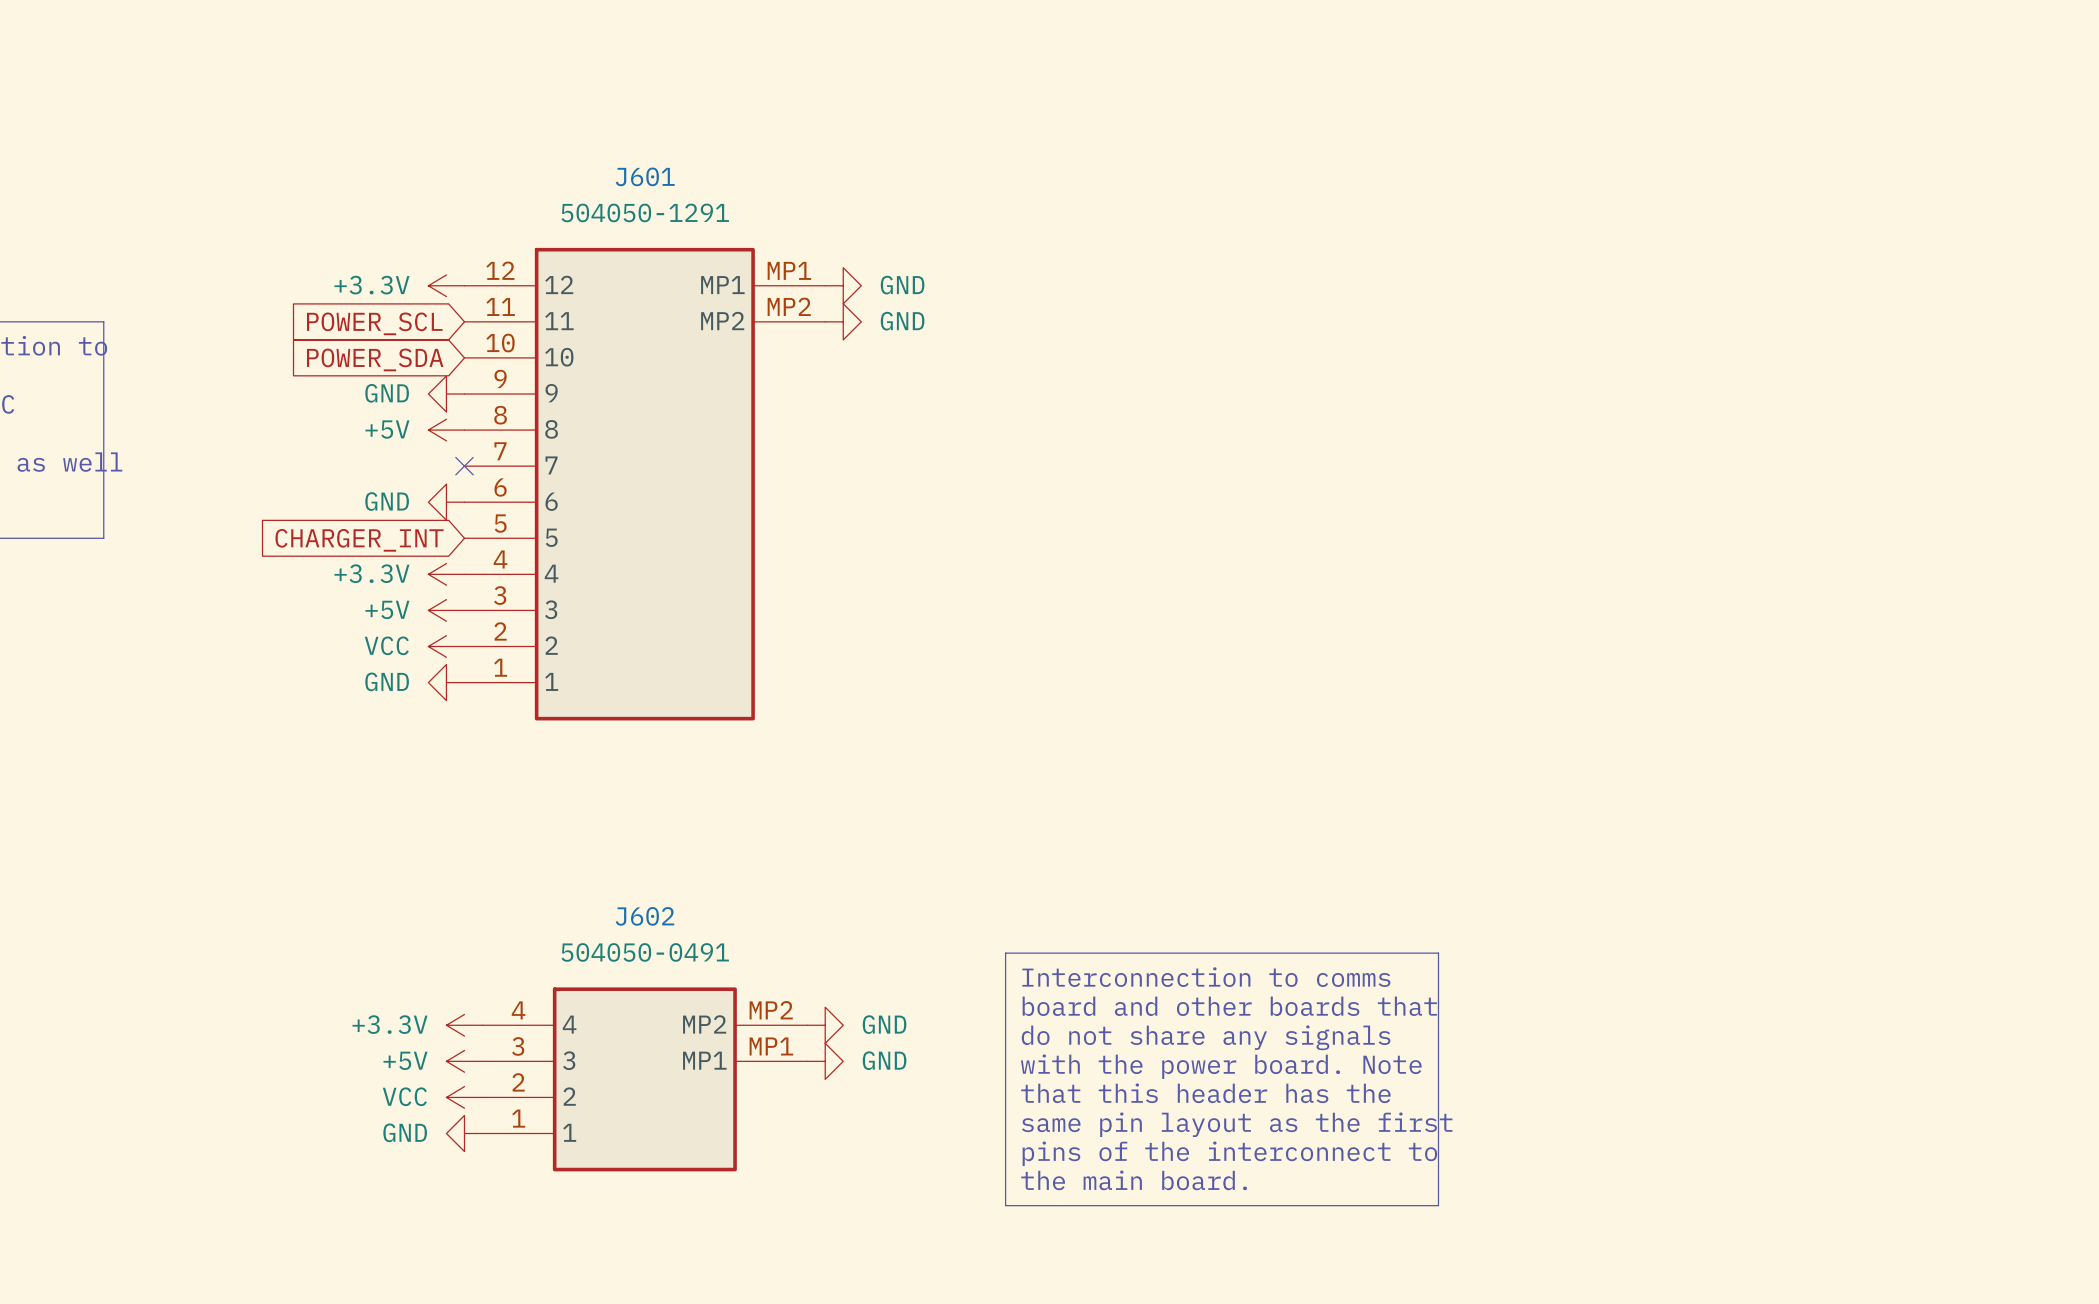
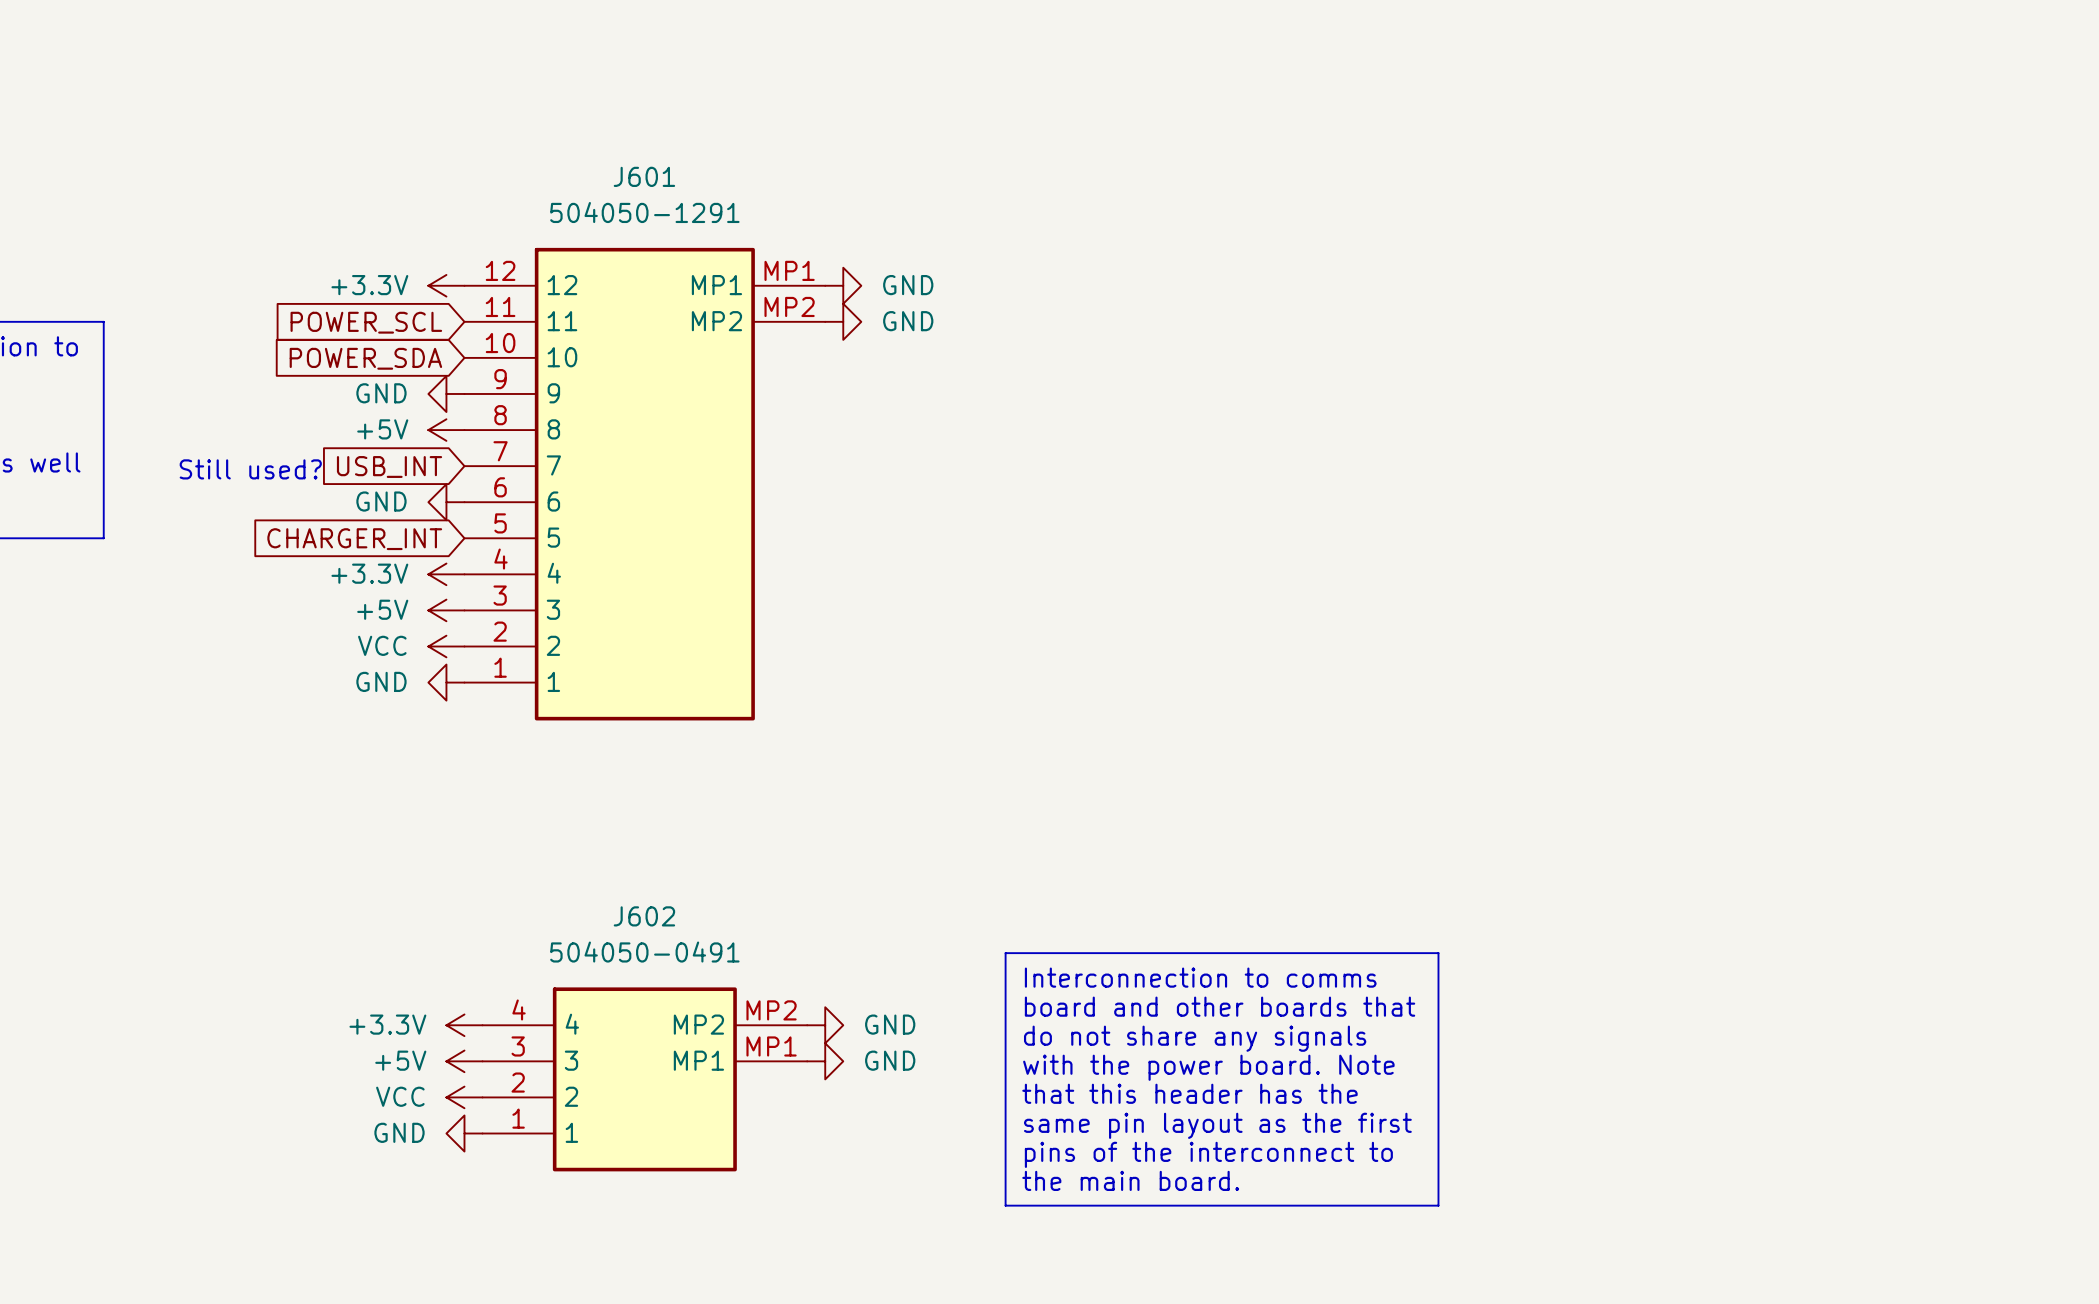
no-connect mark: (464, 466) -> none
text: none -> Still used? (250, 469)
global label: none -> USB_INT (389, 466)

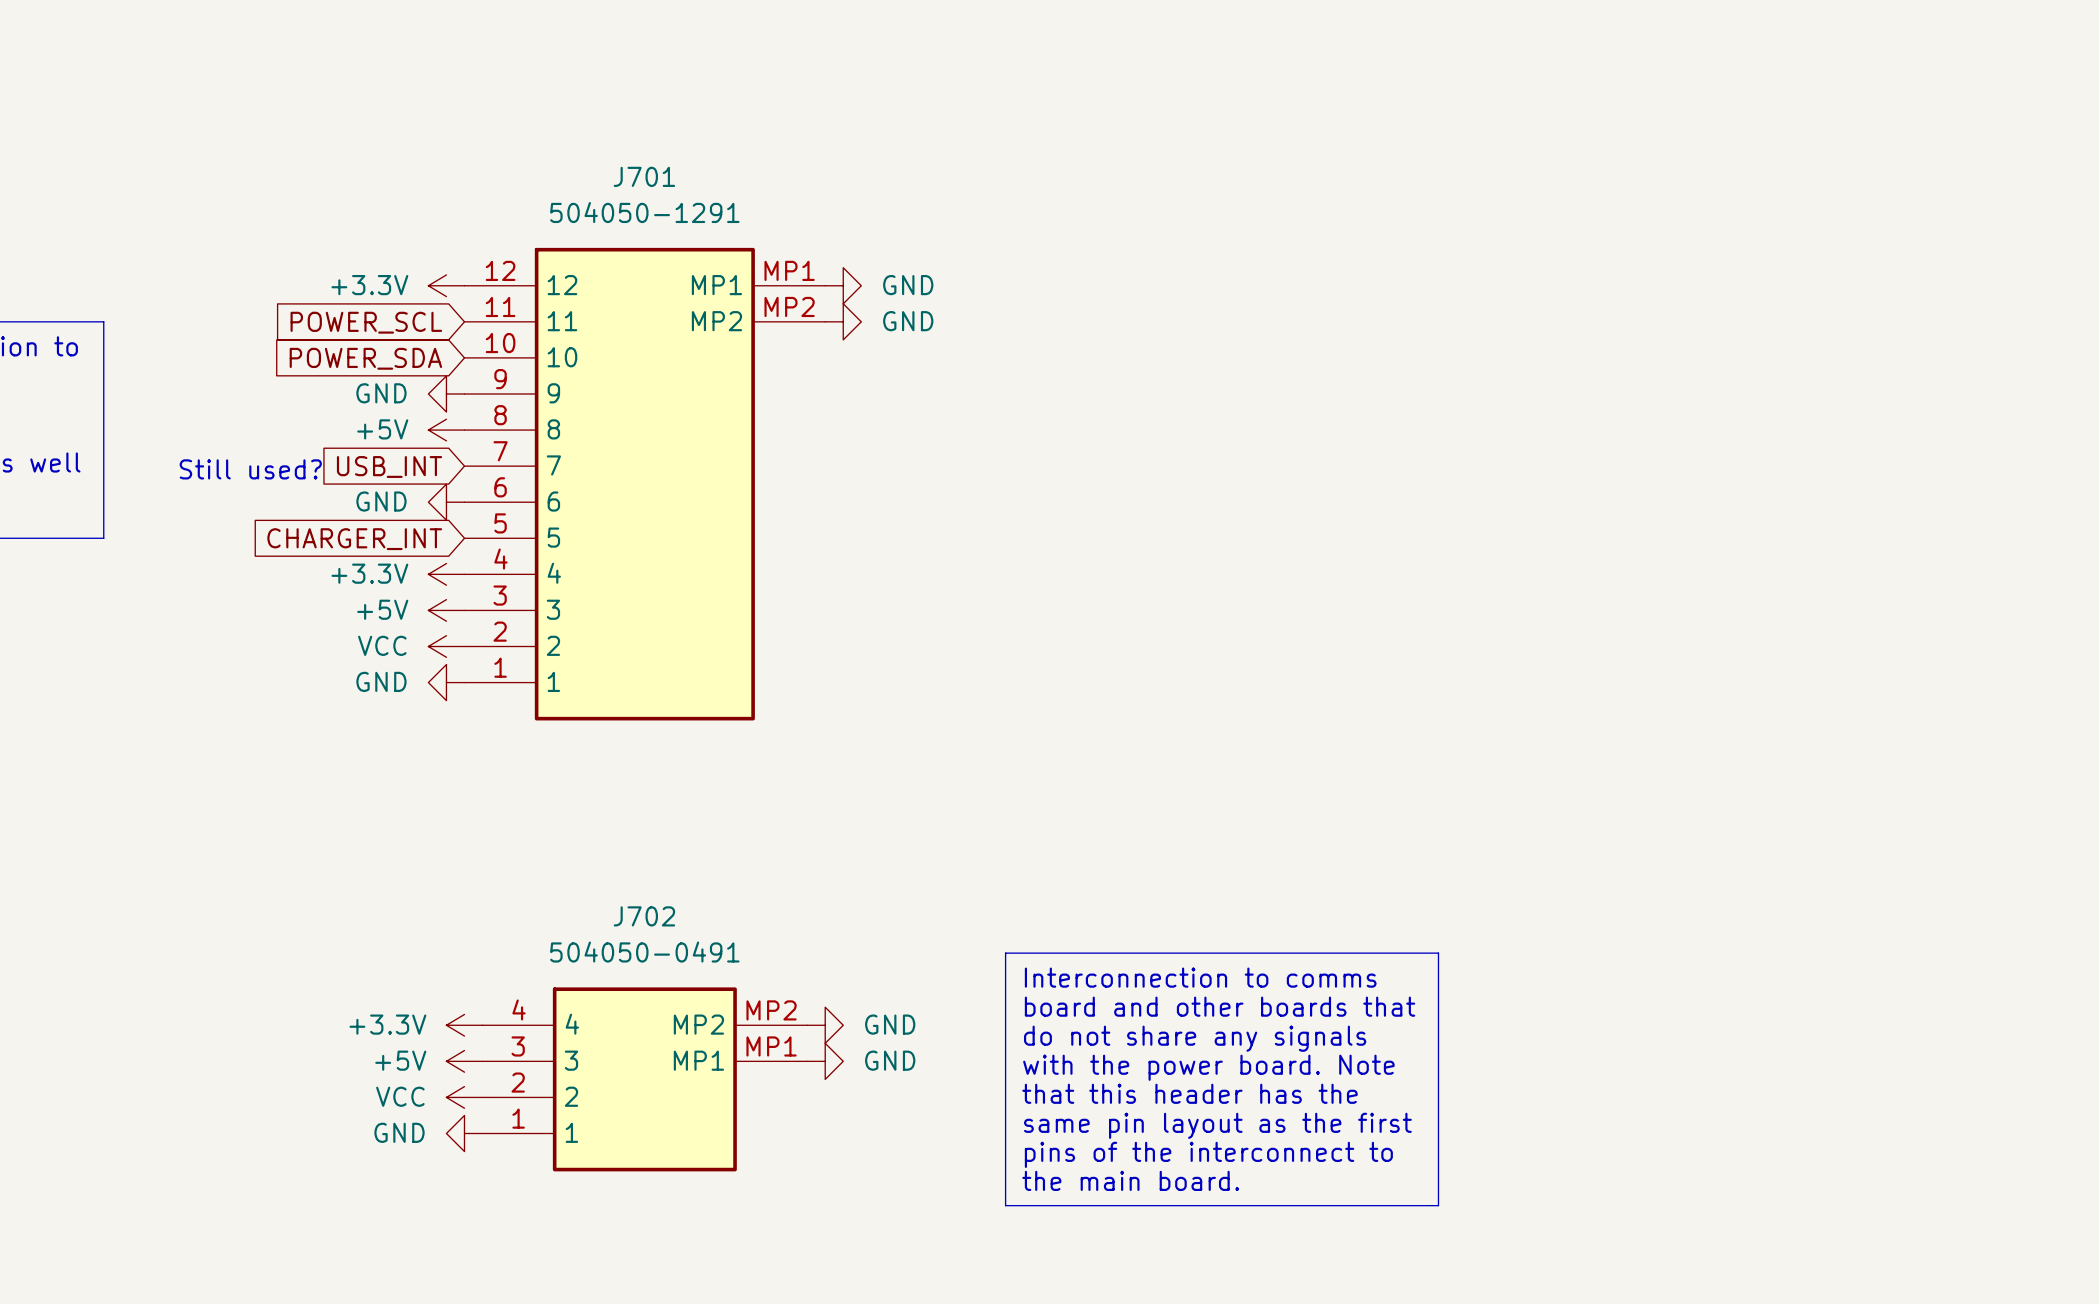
J601 name: J601 (644, 176) -> J701 (644, 176)
J602 name: J602 (644, 916) -> J702 (644, 916)

